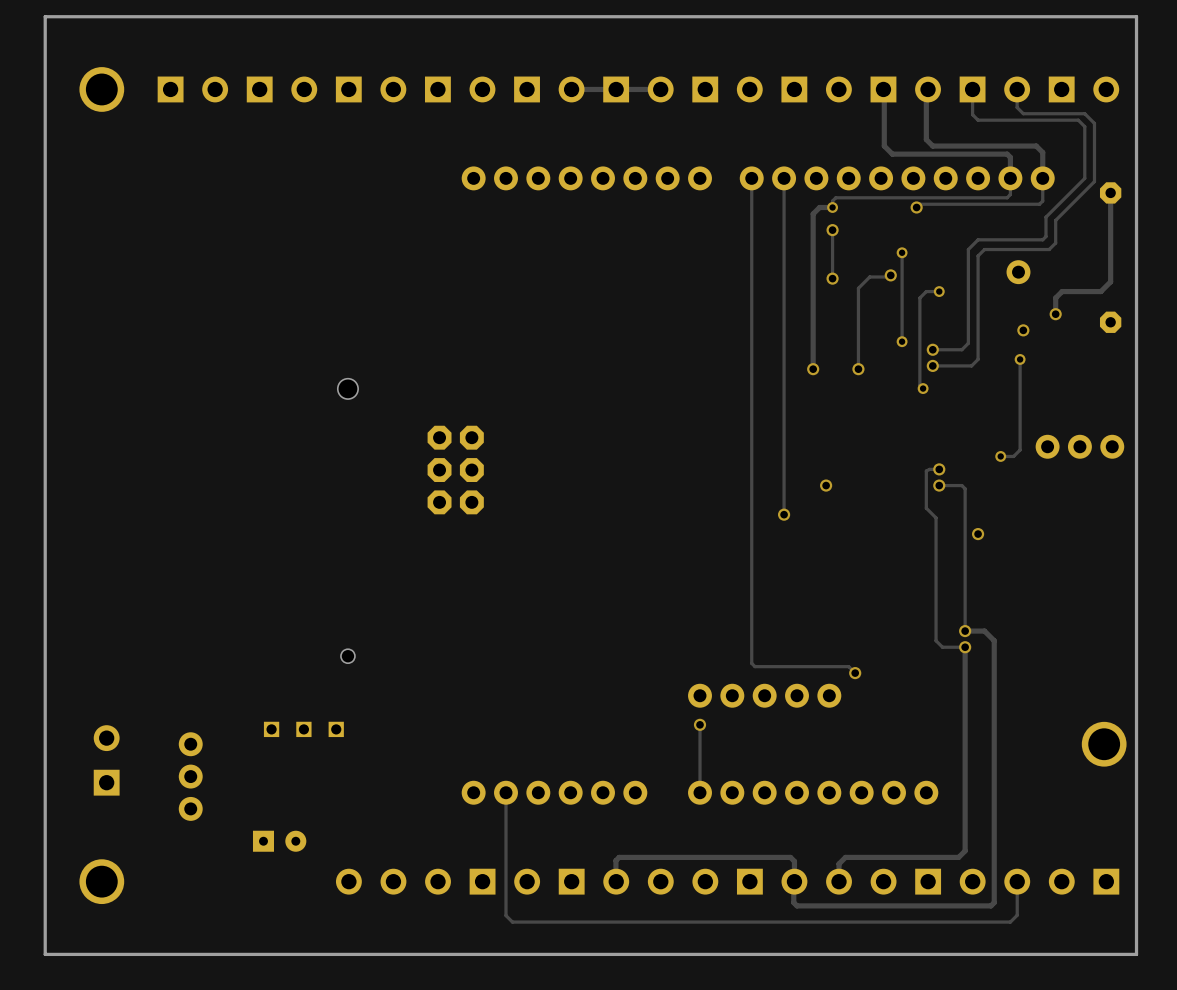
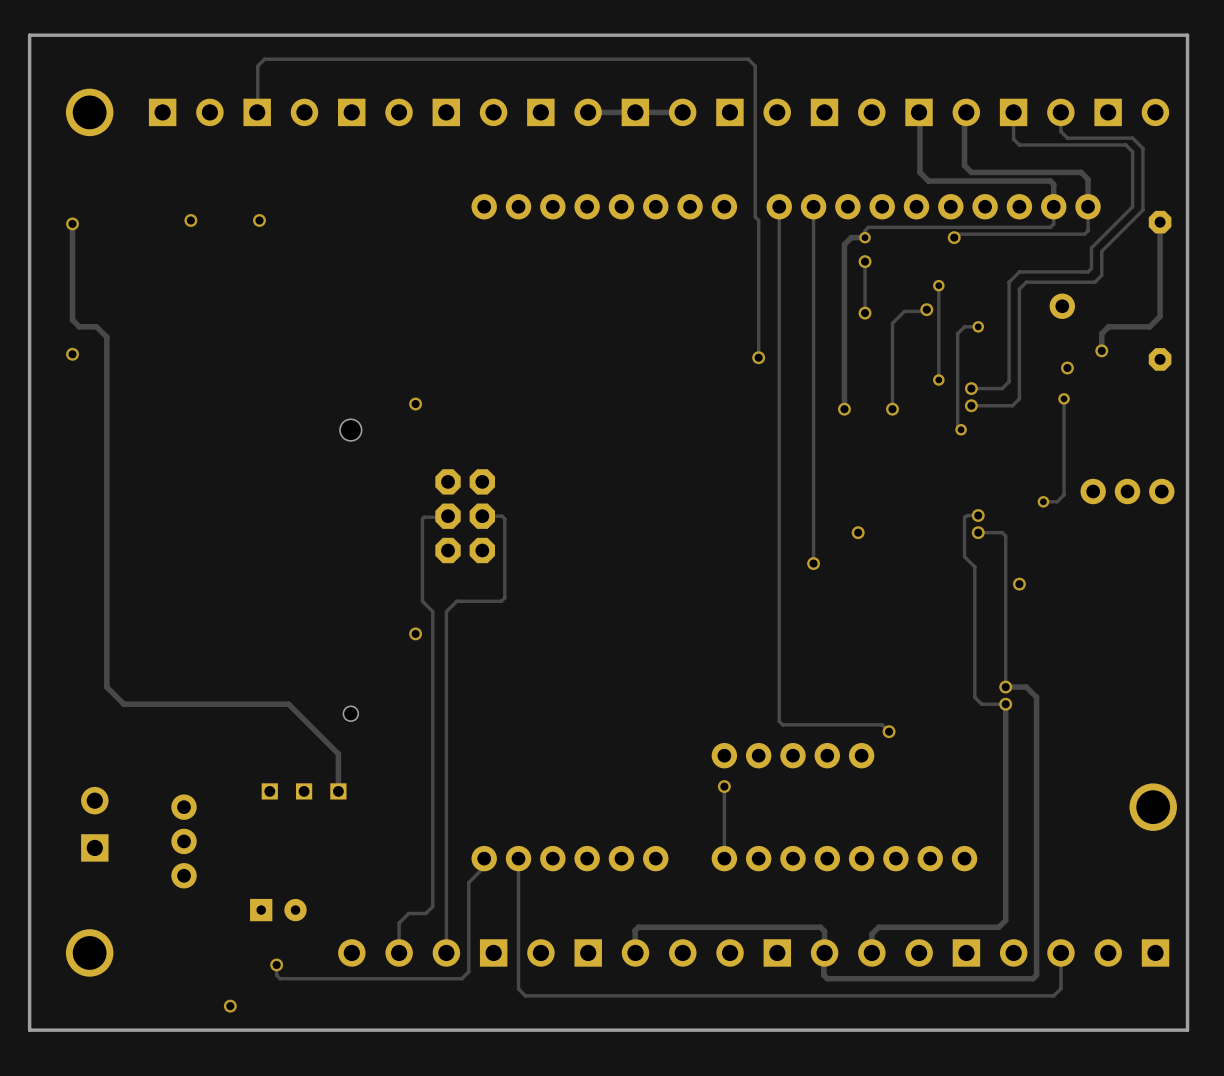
track: none -> (257, 112) (257, 66) (264, 59) (748, 59) (755, 66) (755, 217) (758, 220) (758, 357)
via: none -> (190, 220)
via: none -> (259, 220)
track: none -> (72, 223) (72, 319) (79, 326) (96, 326) (106, 337) (106, 687) (123, 704) (288, 704) (338, 753) (338, 791)
via: none -> (72, 223)
via: none -> (72, 354)
via: none -> (758, 357)
via: none -> (415, 404)
track: none -> (448, 516) (424, 517) (422, 518) (422, 601) (432, 611) (432, 906) (425, 913) (408, 913) (399, 923) (399, 952)
track: none -> (482, 516) (502, 516) (504, 518) (504, 597) (501, 601) (456, 601) (446, 611) (446, 952)
via: none -> (415, 633)
track: none -> (484, 858) (484, 867) (468, 882) (468, 971) (461, 978) (280, 978) (276, 975) (276, 964)
via: none -> (276, 964)
via: none -> (230, 1006)

